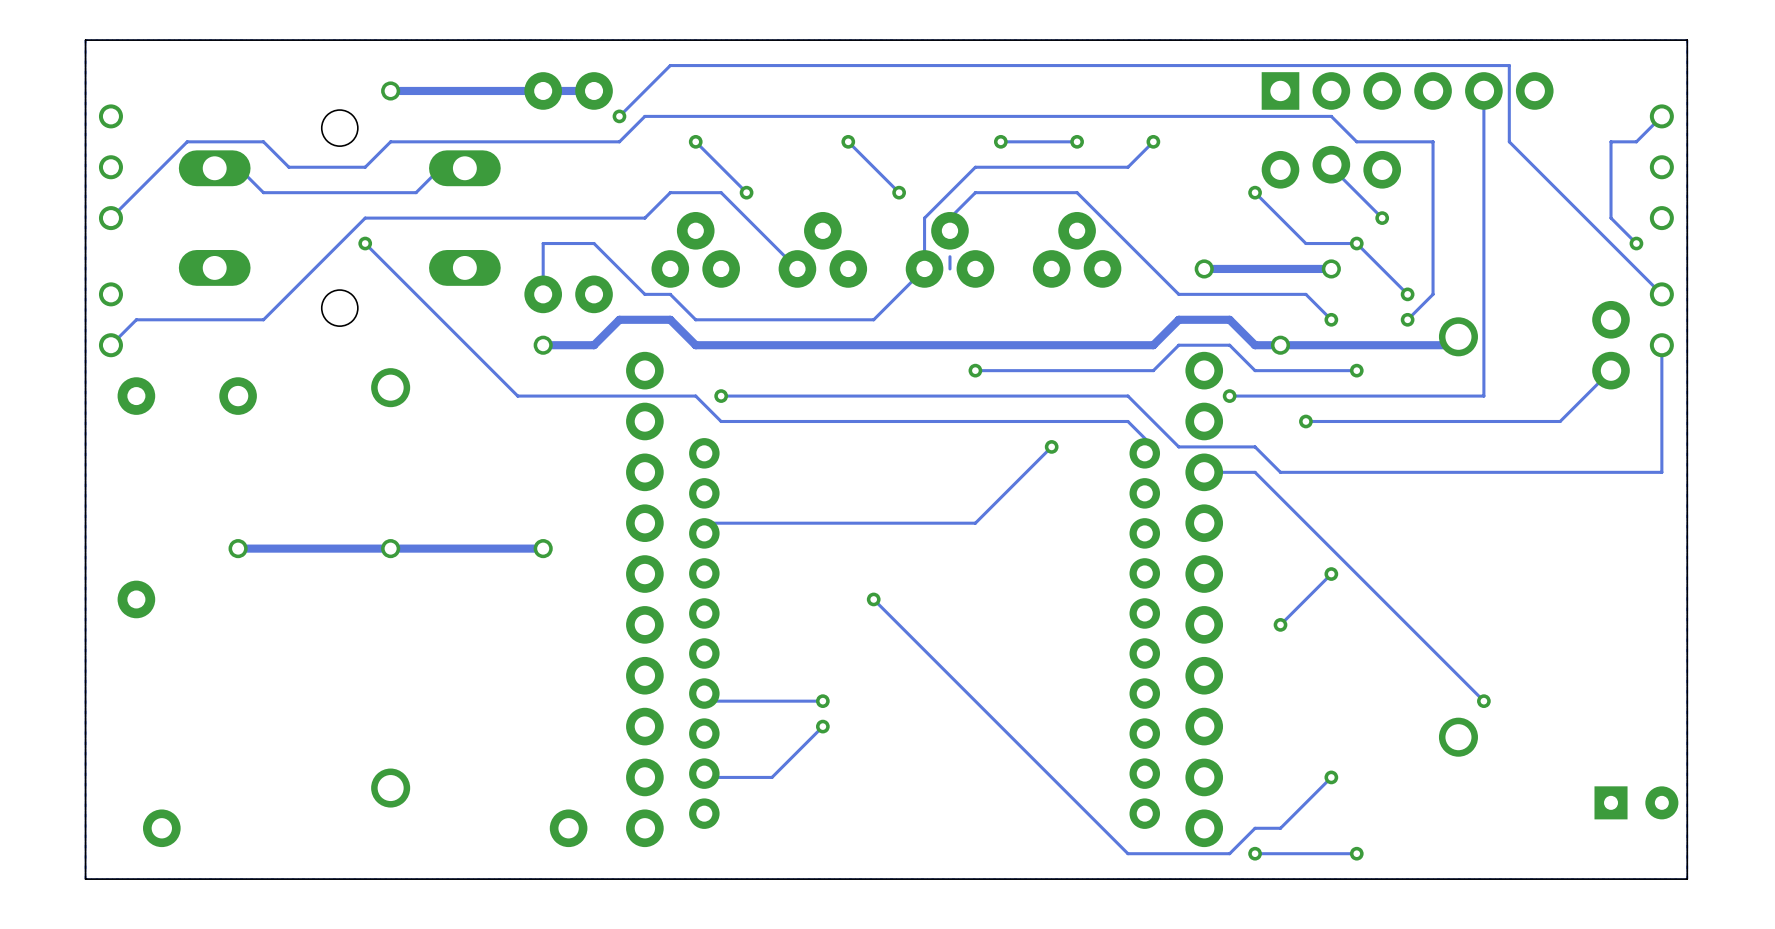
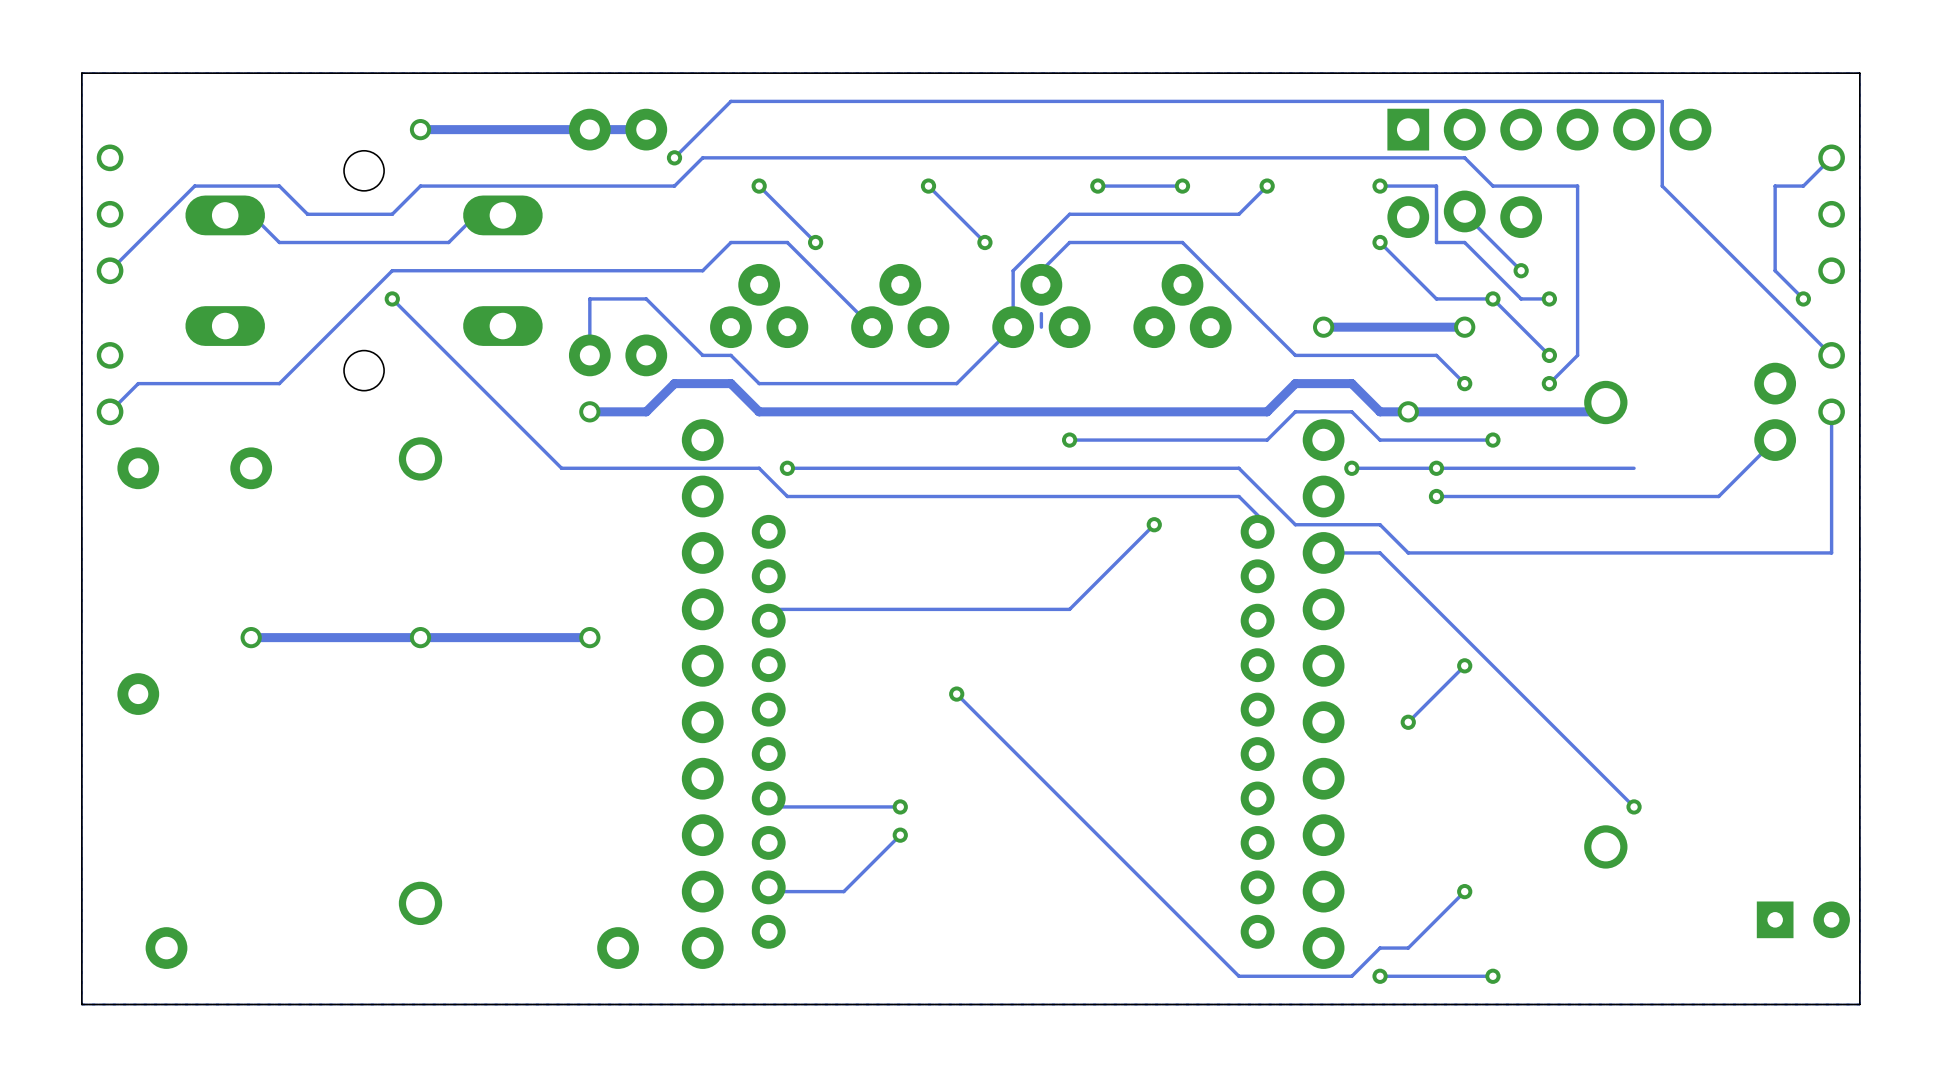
track: (1483, 90) (1483, 396) -> none
track: none -> (1380, 186) (1436, 186) (1436, 242) (1464, 242) (1521, 298) (1549, 298)
via: none -> (1380, 186)
via: none -> (1549, 298)
via: none -> (1436, 468)

